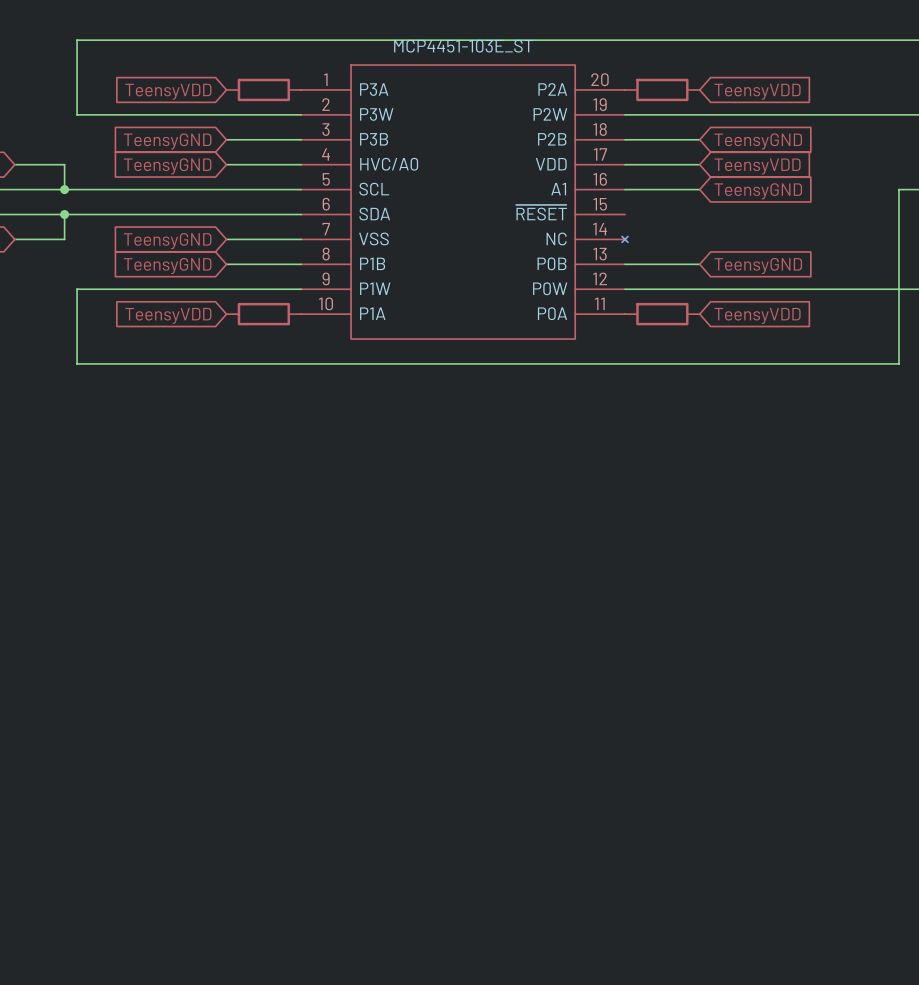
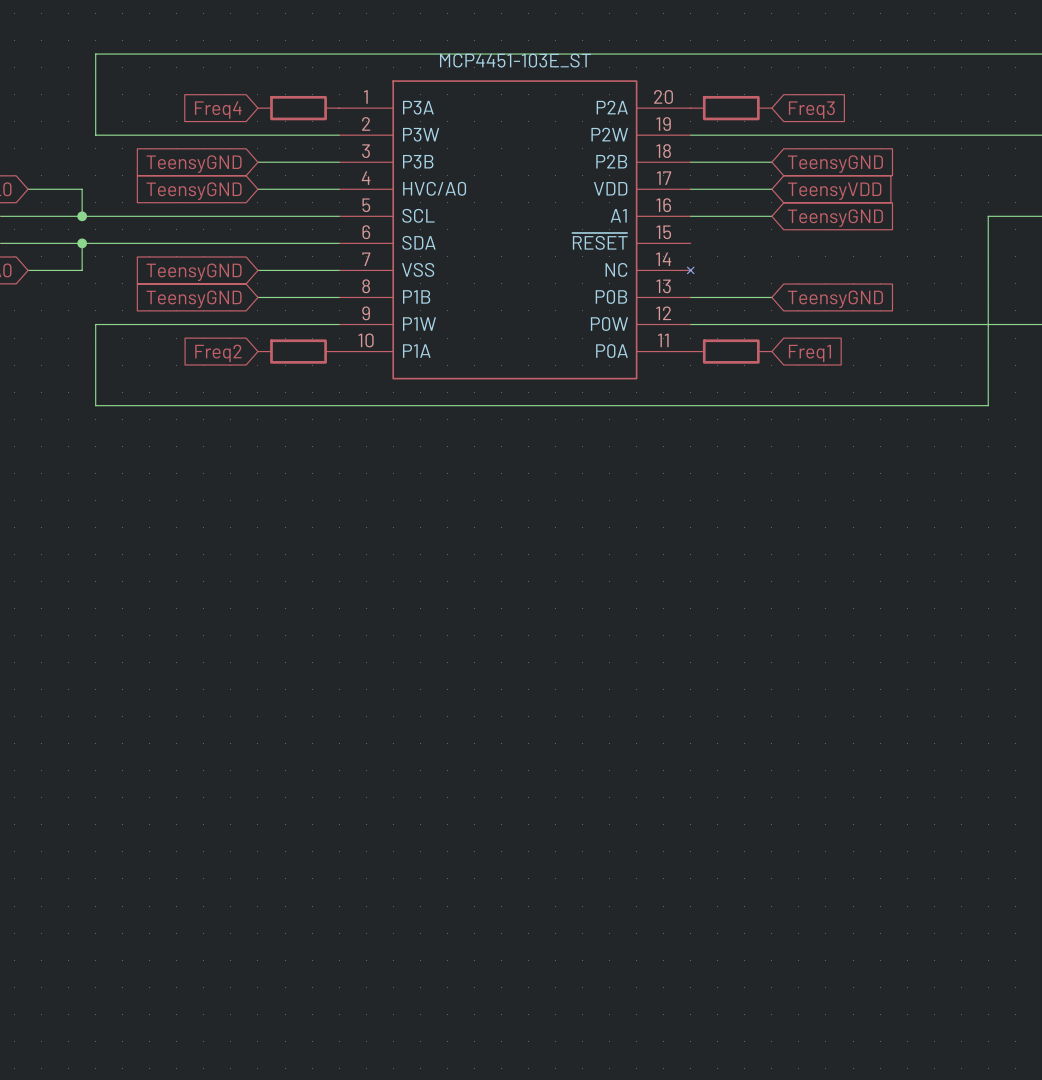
global label: TeensyVDD (168, 91) -> Freq4 (218, 110)
global label: TeensyVDD (757, 91) -> Freq3 (811, 110)
global label: TeensyVDD (168, 315) -> Freq2 (218, 353)
global label: TeensyVDD (757, 315) -> Freq1 (809, 353)

